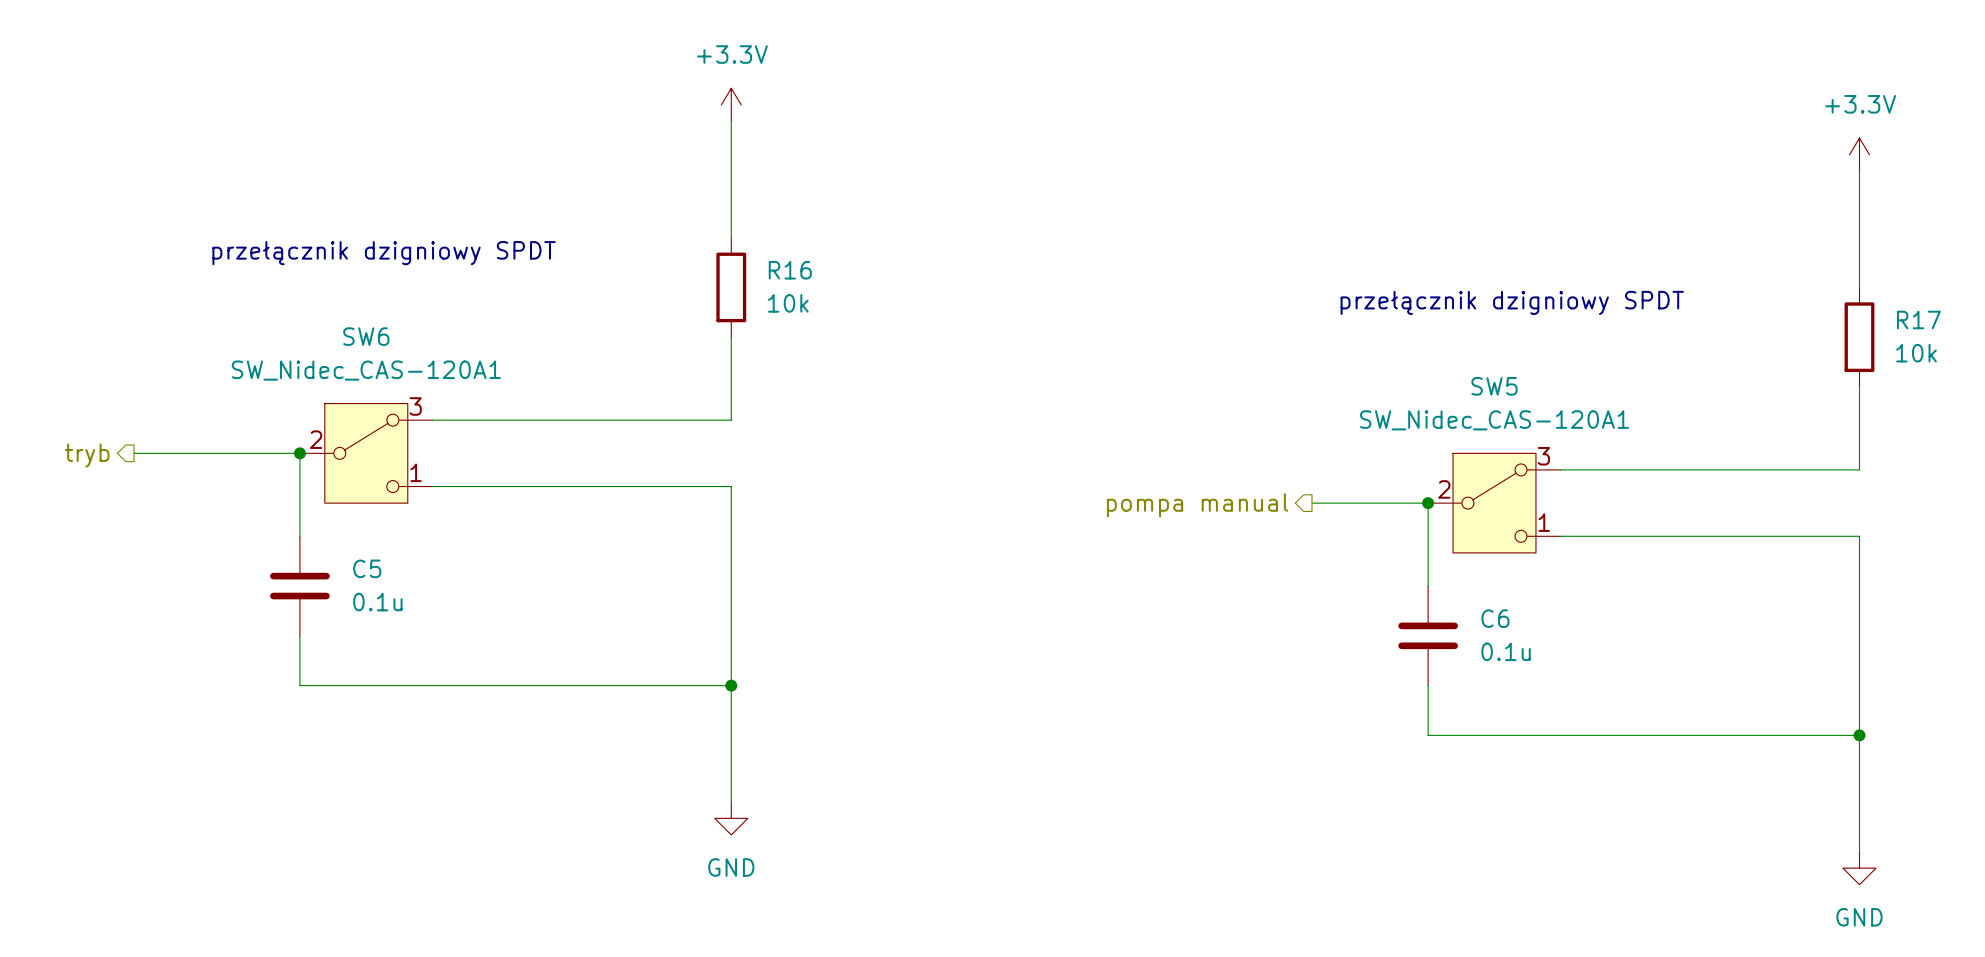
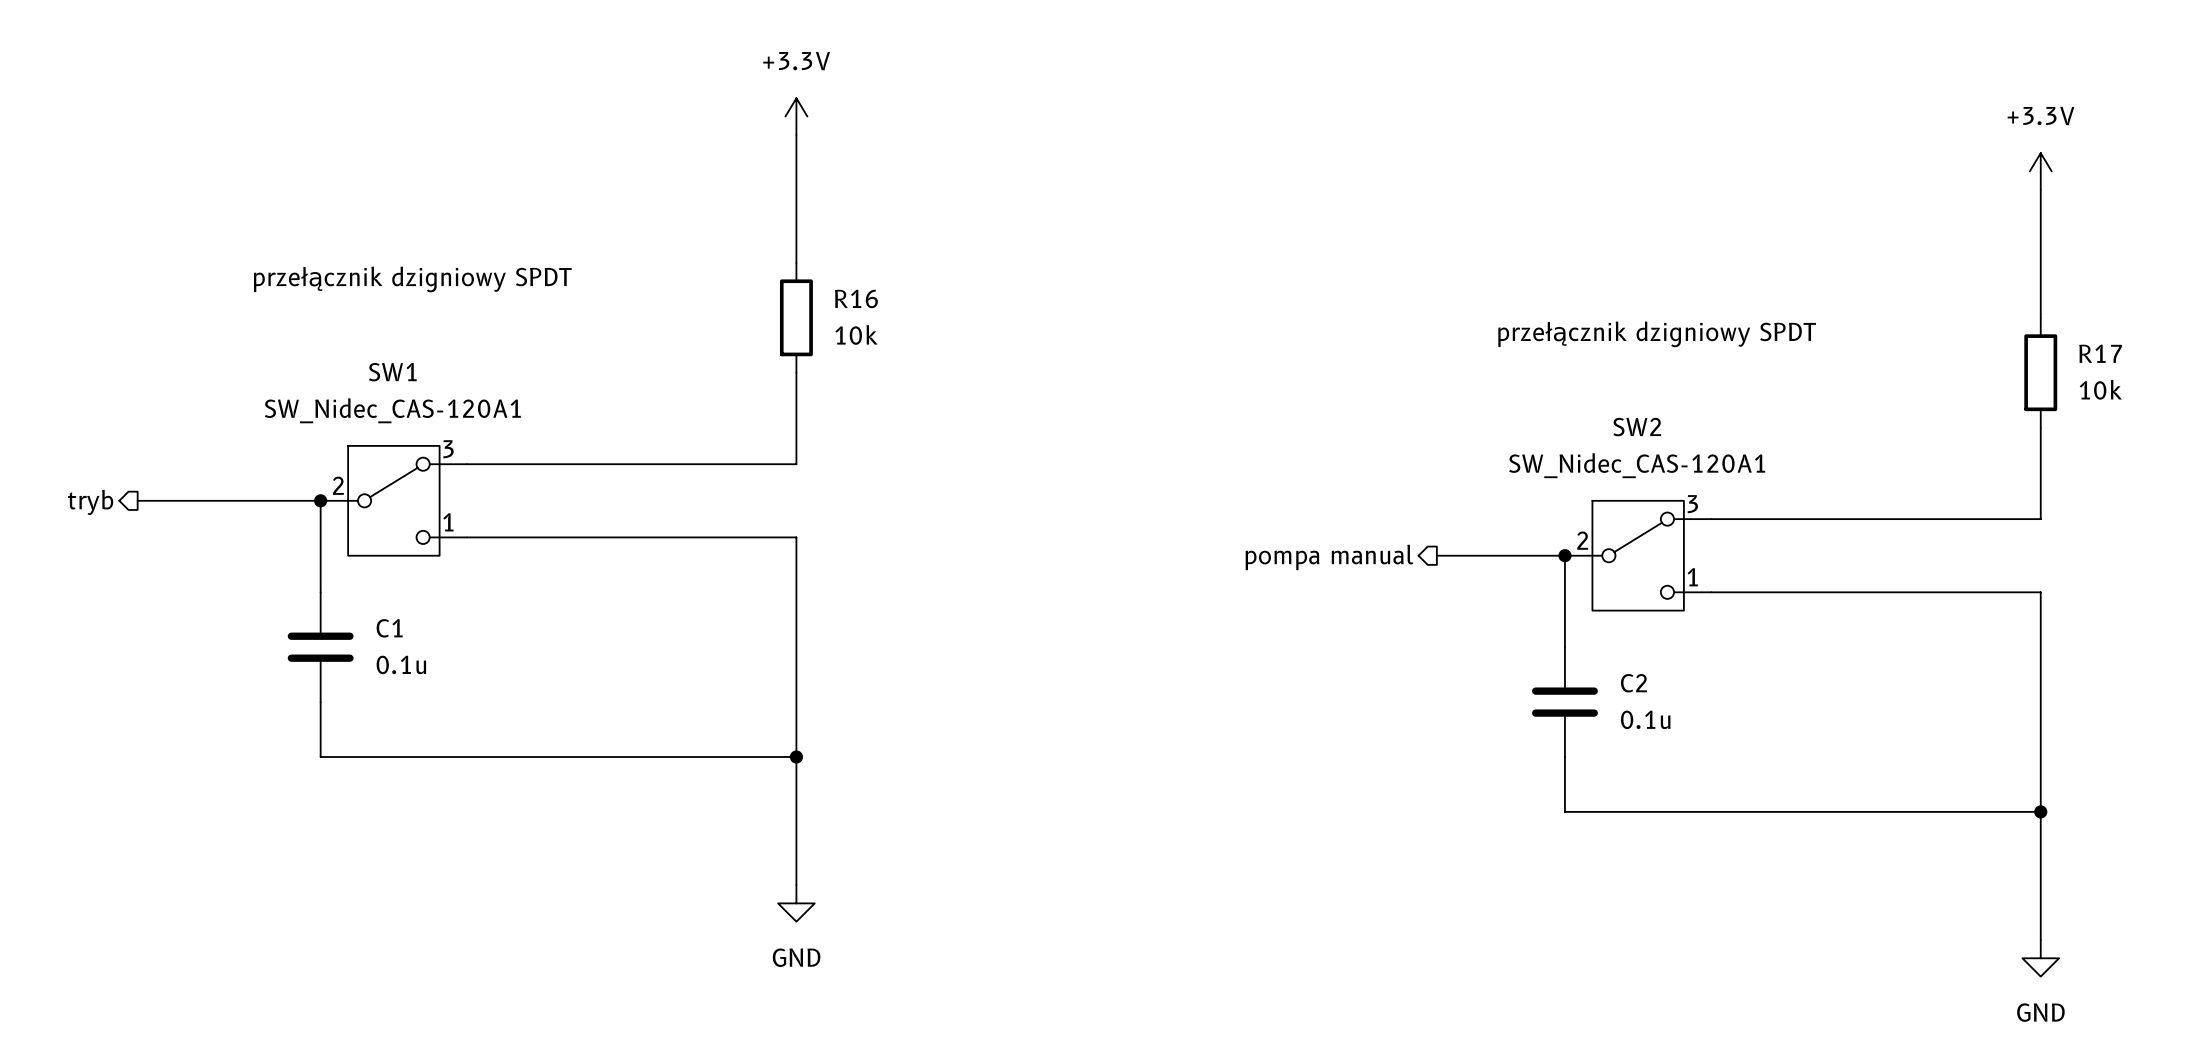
SW6 name: SW6 (366, 336) -> SW1 (392, 372)
SW5 name: SW5 (1494, 386) -> SW2 (1637, 427)
C5 name: C5 (367, 568) -> C1 (389, 628)
C6 name: C6 (1495, 618) -> C2 (1633, 683)

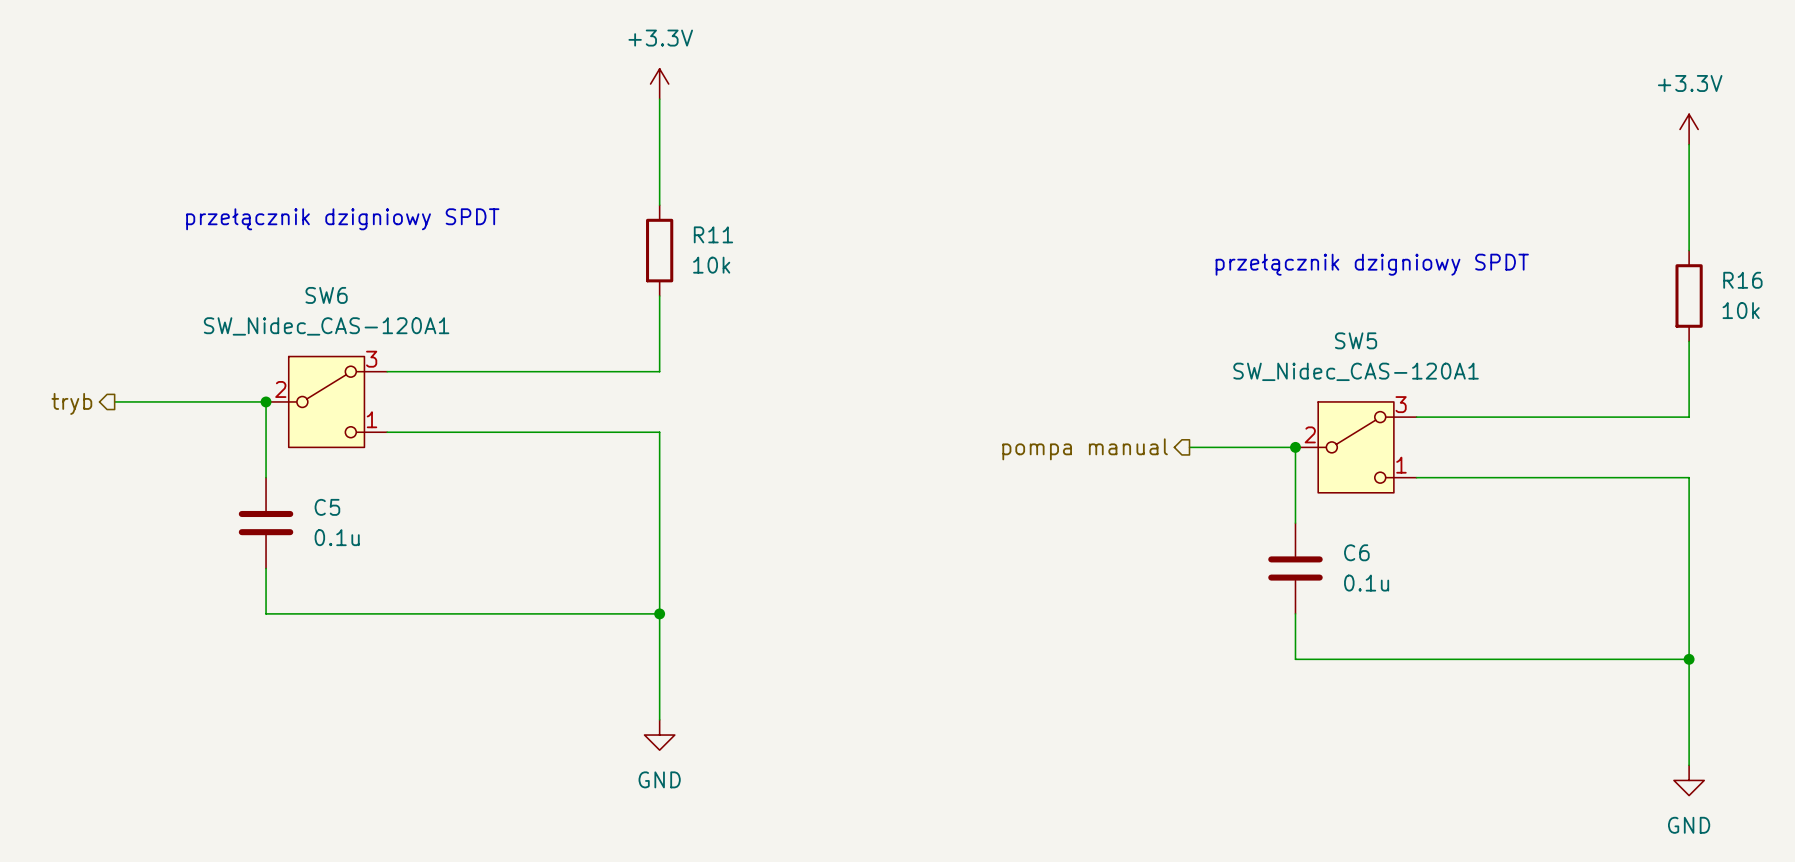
R16 name: R16 (856, 298) -> R11 (713, 234)
R17 name: R17 (2100, 353) -> R16 (1742, 280)
SW1 name: SW1 (392, 372) -> SW6 (326, 295)
SW2 name: SW2 (1637, 427) -> SW5 (1356, 340)
C1 name: C1 (389, 628) -> C5 (327, 507)
C2 name: C2 (1633, 683) -> C6 (1356, 552)

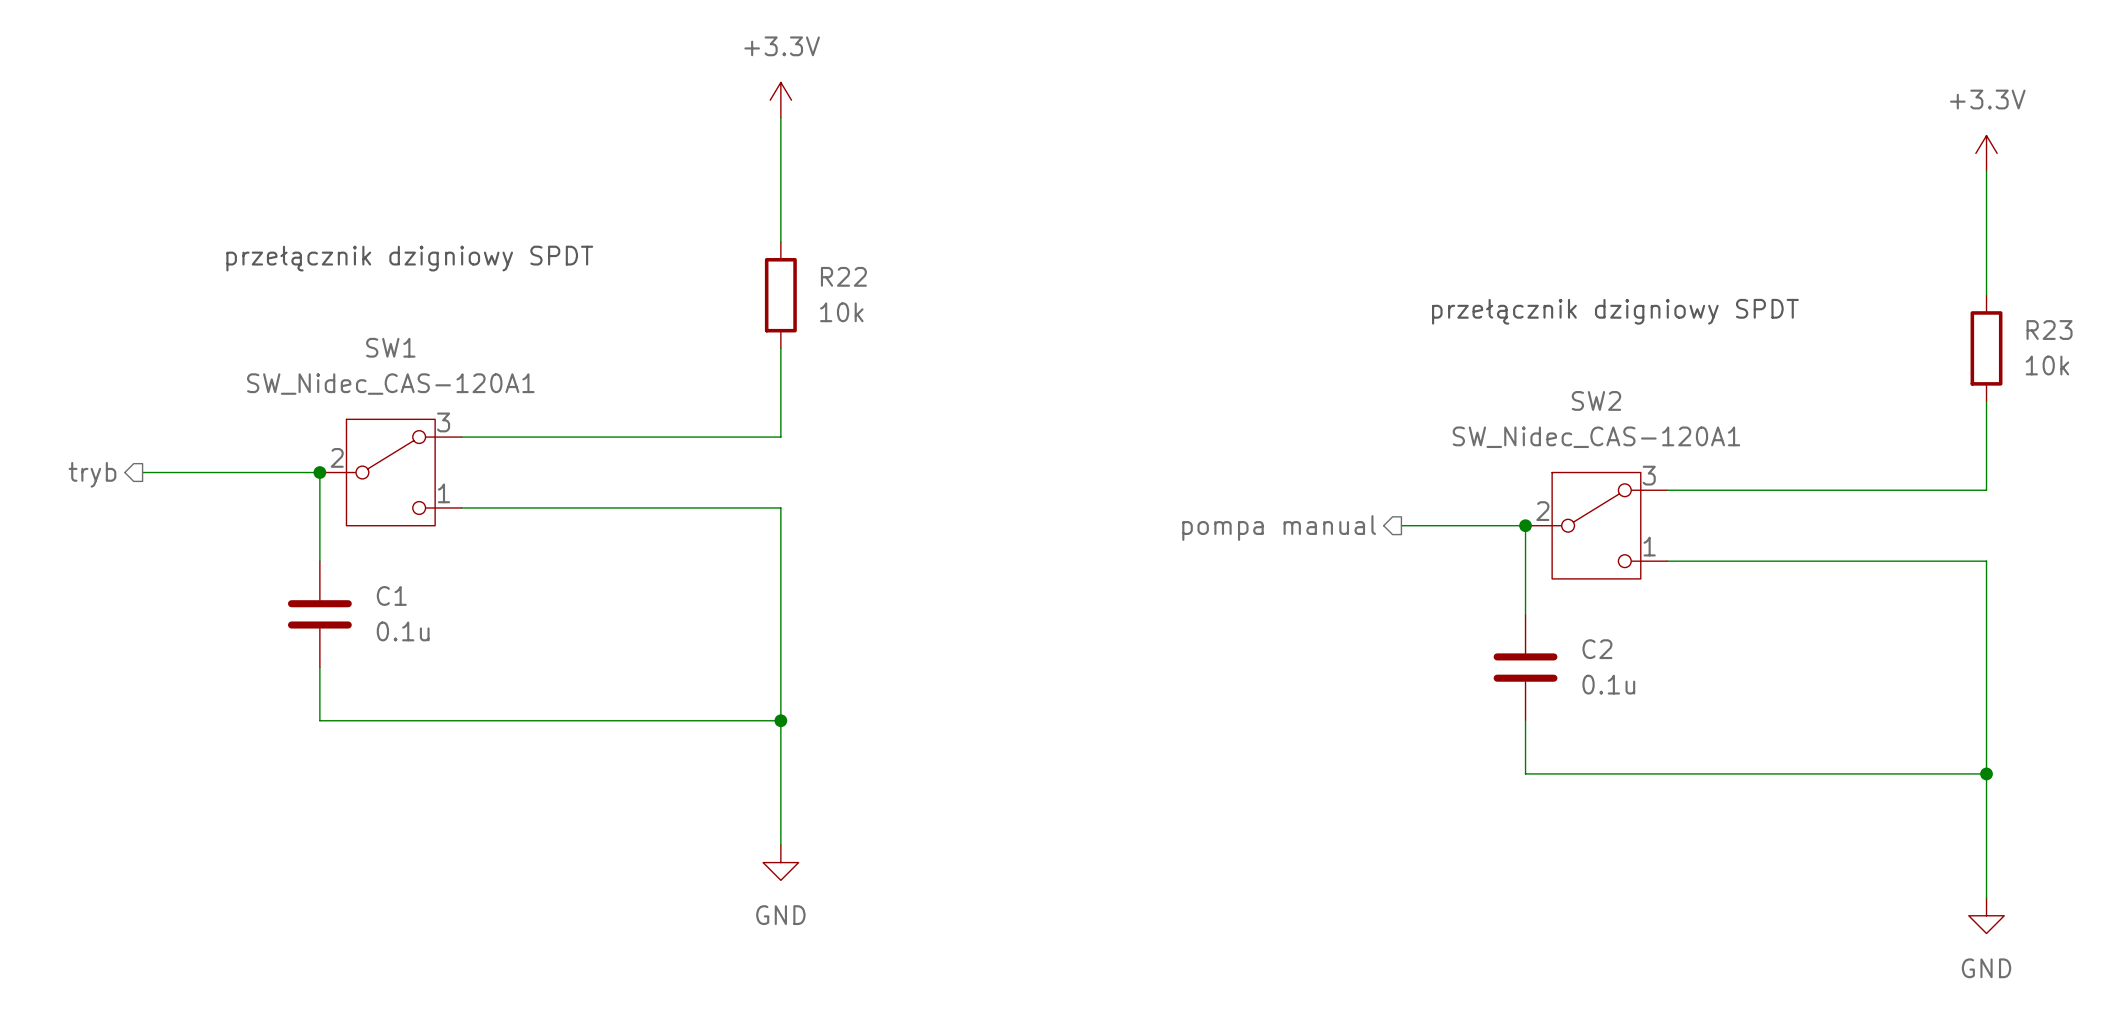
R11 name: R11 (713, 234) -> R22 (843, 276)
R16 name: R16 (1742, 280) -> R23 (2049, 330)
SW6 name: SW6 (326, 295) -> SW1 (390, 347)
SW5 name: SW5 (1356, 340) -> SW2 (1596, 400)
C5 name: C5 (327, 507) -> C1 (391, 595)
C6 name: C6 (1356, 552) -> C2 (1597, 649)

